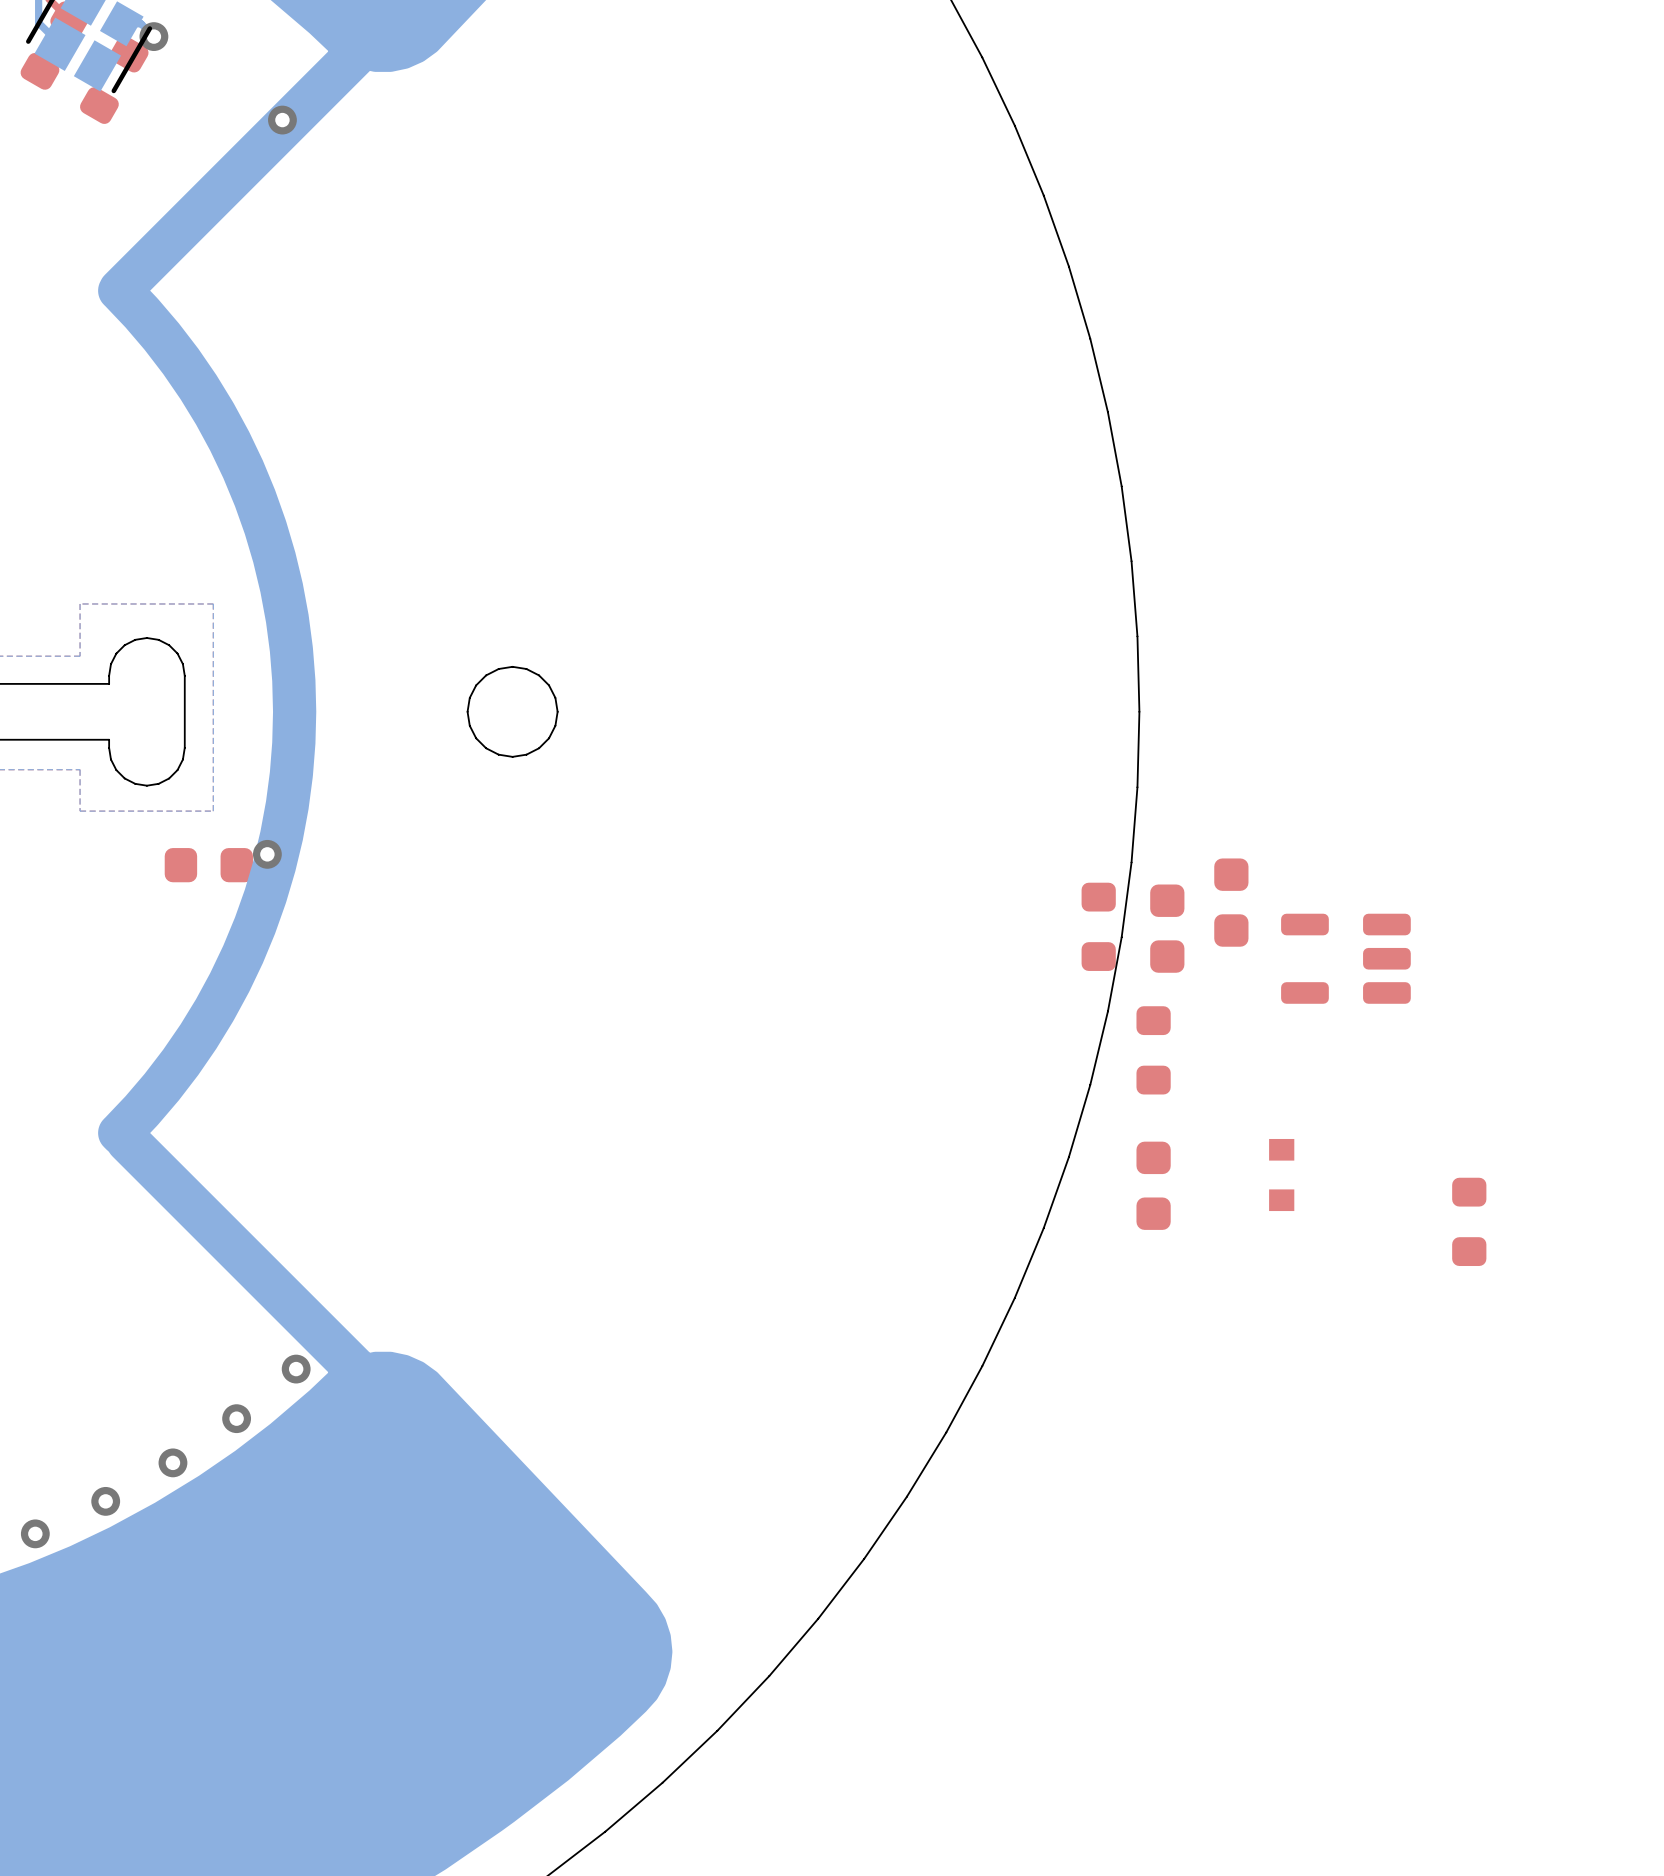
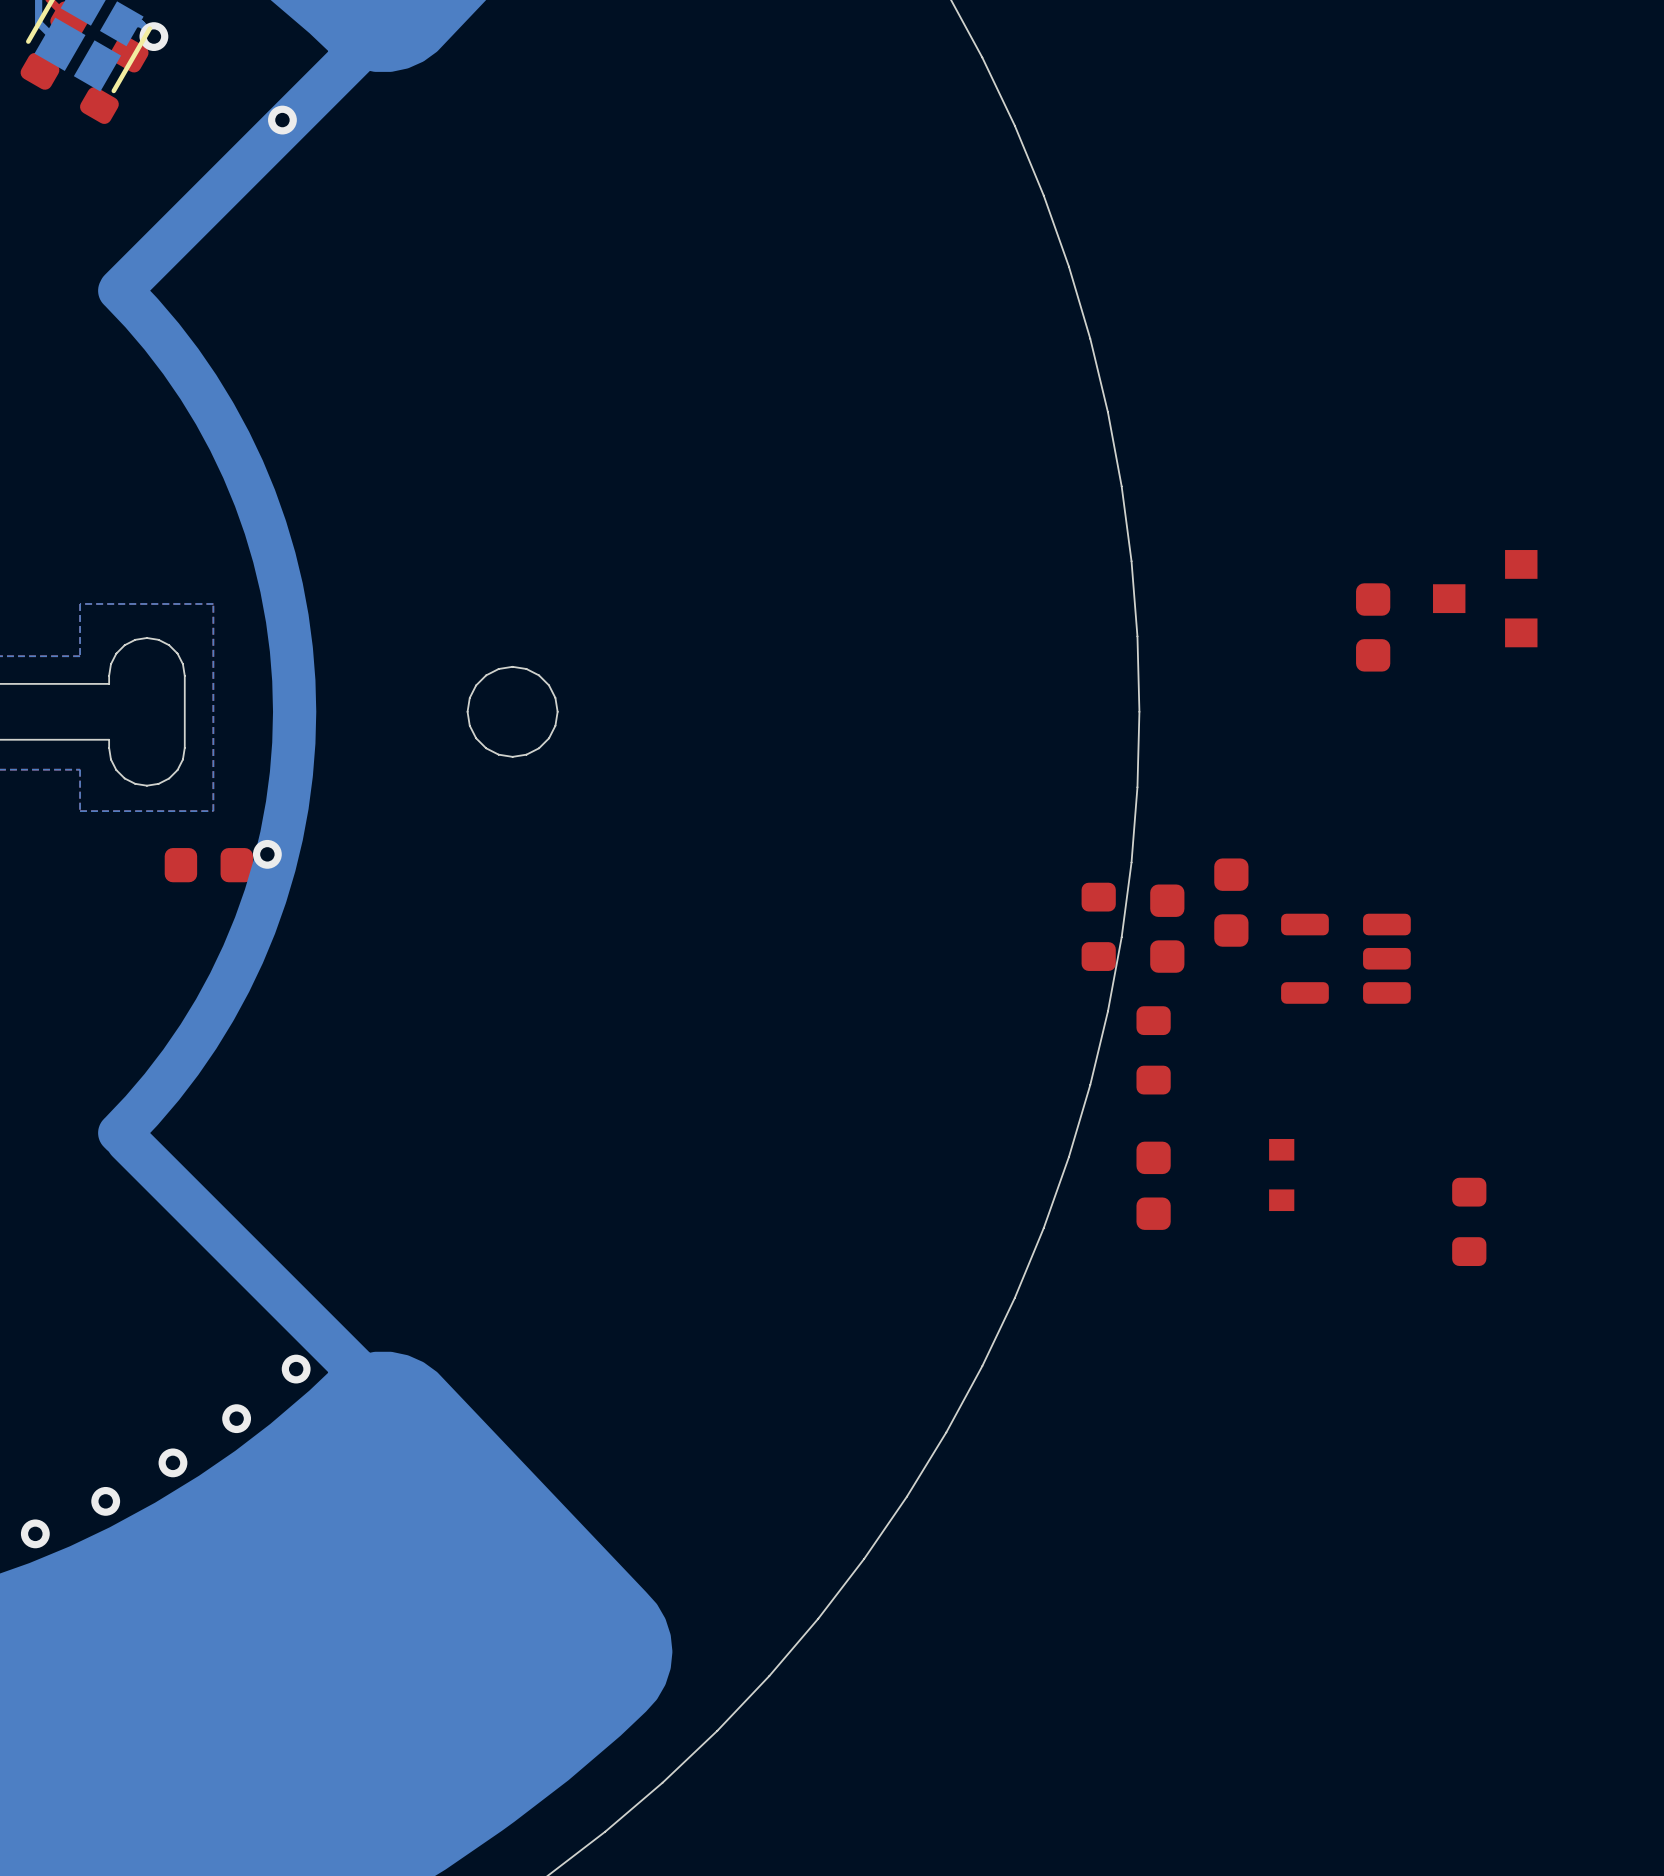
part: none -> (1485, 598)
part: none -> (1373, 627)

